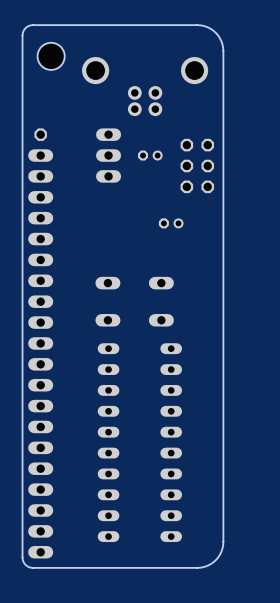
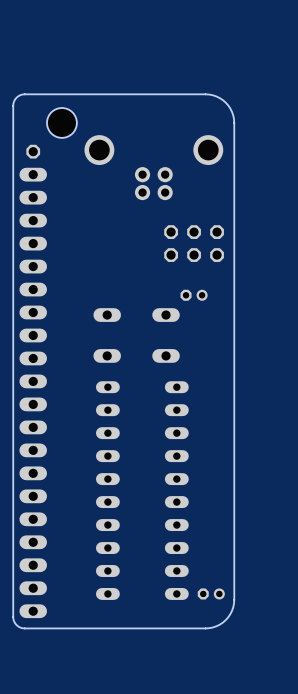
part position: (51, 56) -> (61, 122)
part: (145, 86) -> none
board edge: (22, 92) (22, 34) (28, 25) (200, 25) (215, 32) (222, 44) (223, 108) -> (13, 105) (16, 97) (24, 94) (209, 94) (225, 102) (232, 112) (234, 123)
part footprint: [137, 150, 163, 161] -> [84, 135, 224, 201]
part: (108, 155) -> none
part rotation: 0° (197, 165) -> 90° clockwise (194, 243)
part position: (197, 165) -> (194, 243)
part position: (171, 223) -> (194, 295)
part: none -> (211, 593)

